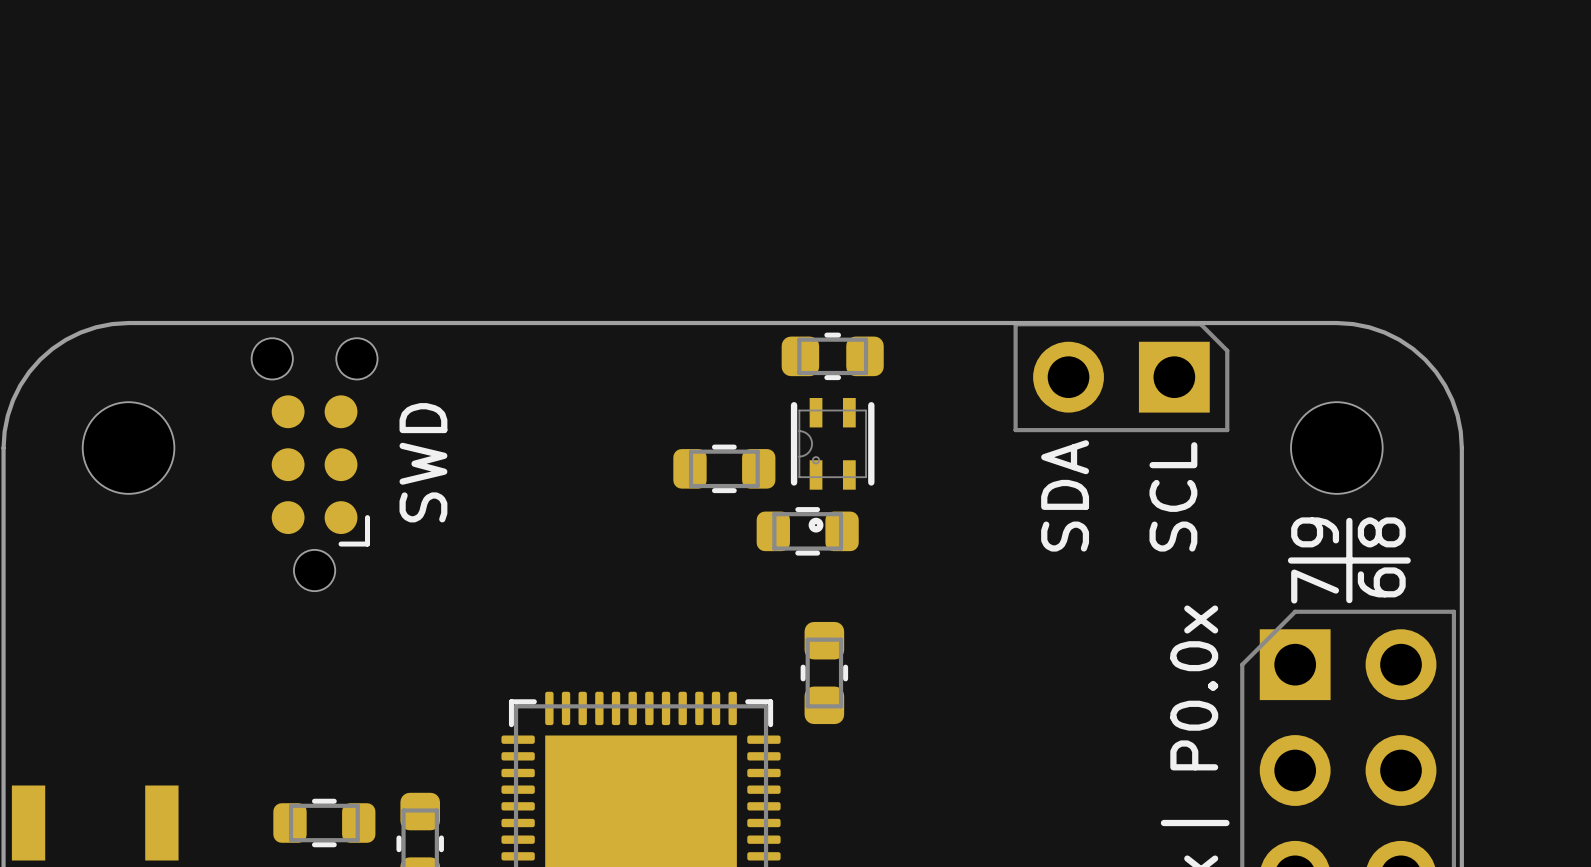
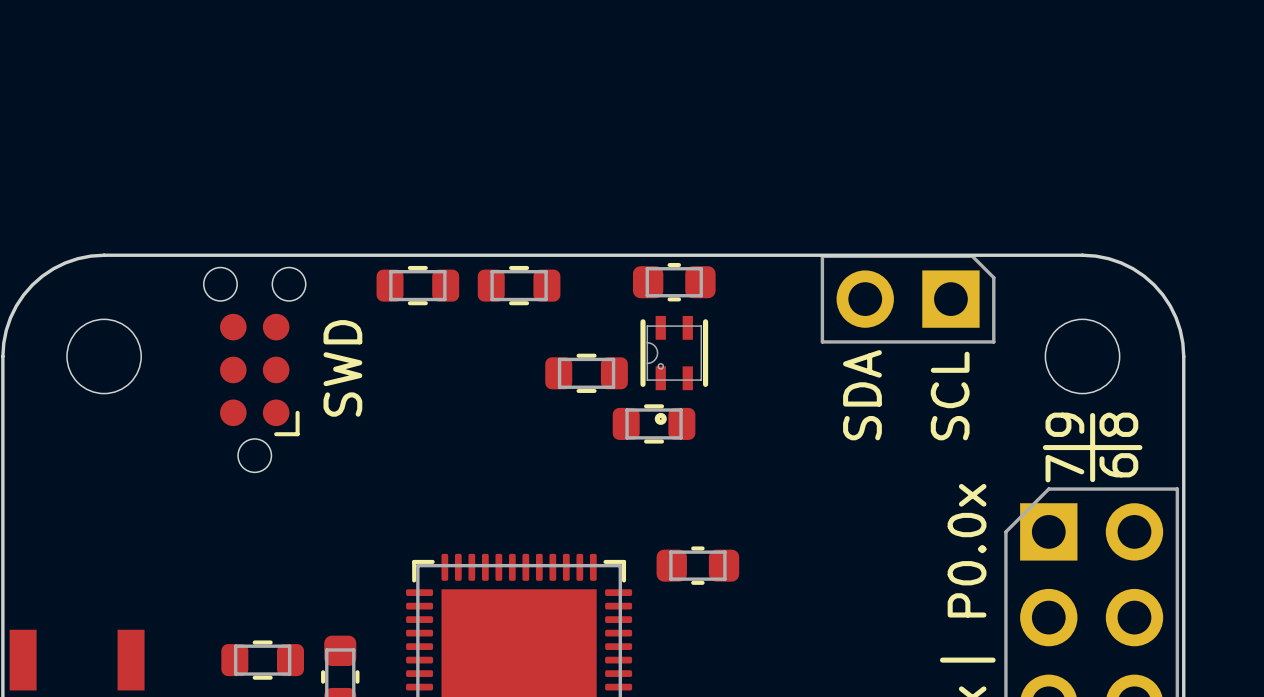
part: none -> (417, 285)
part: none -> (519, 285)
part rotation: 0° (824, 673) -> 90° clockwise (697, 565)

